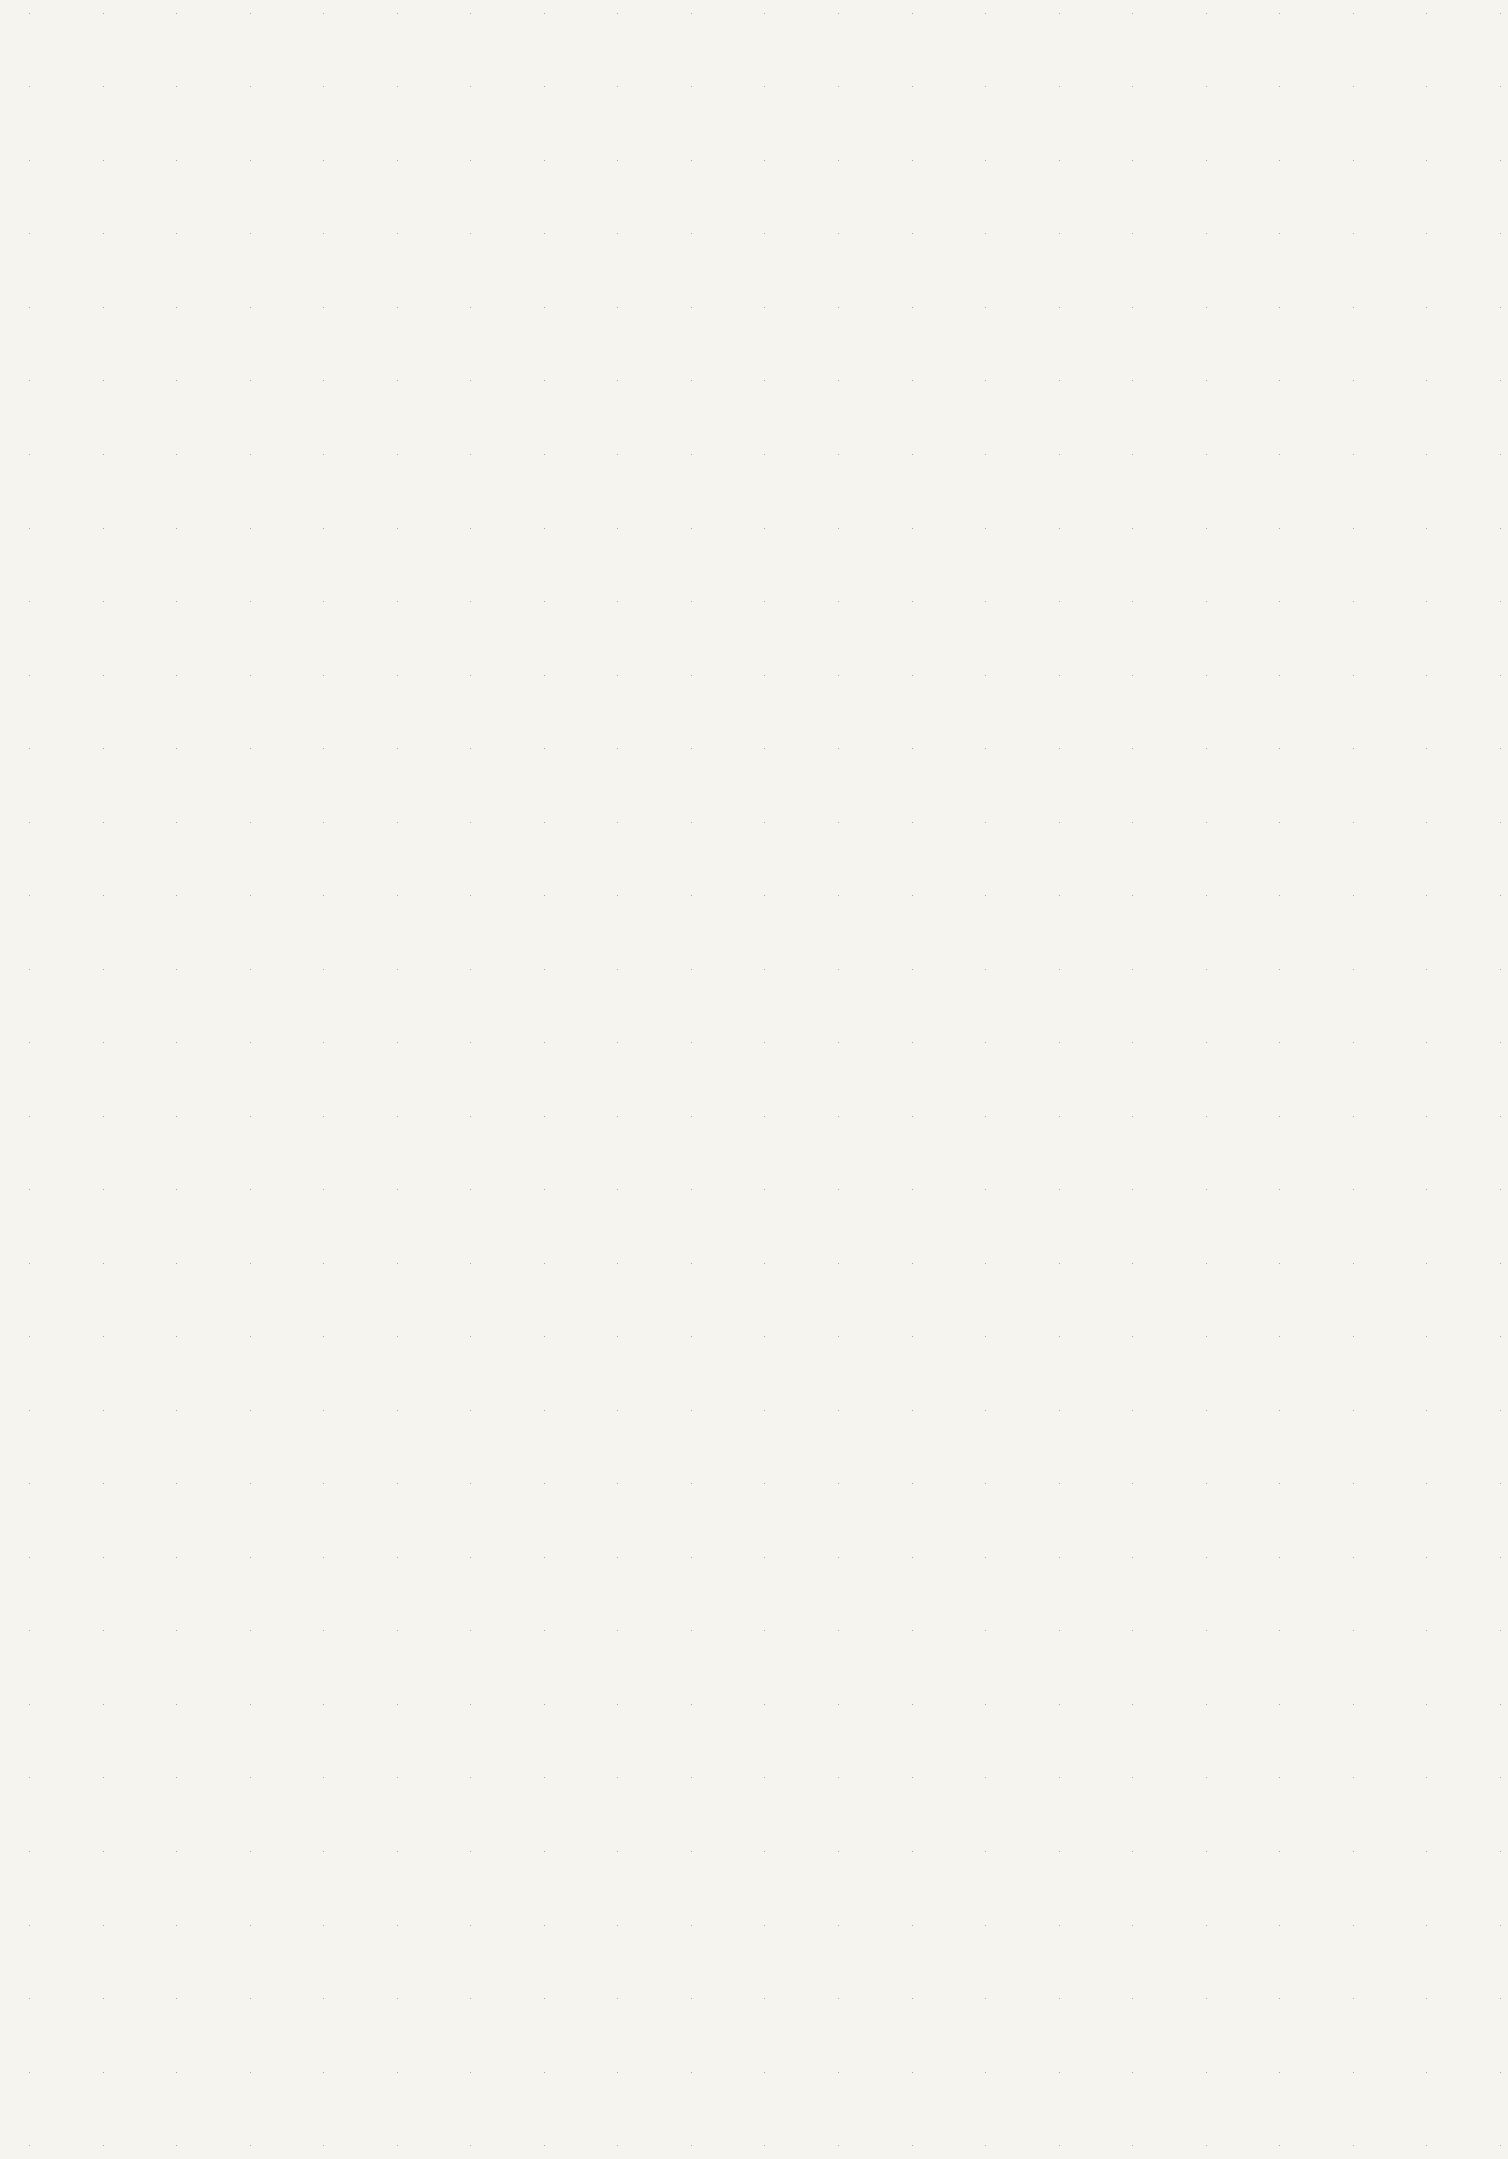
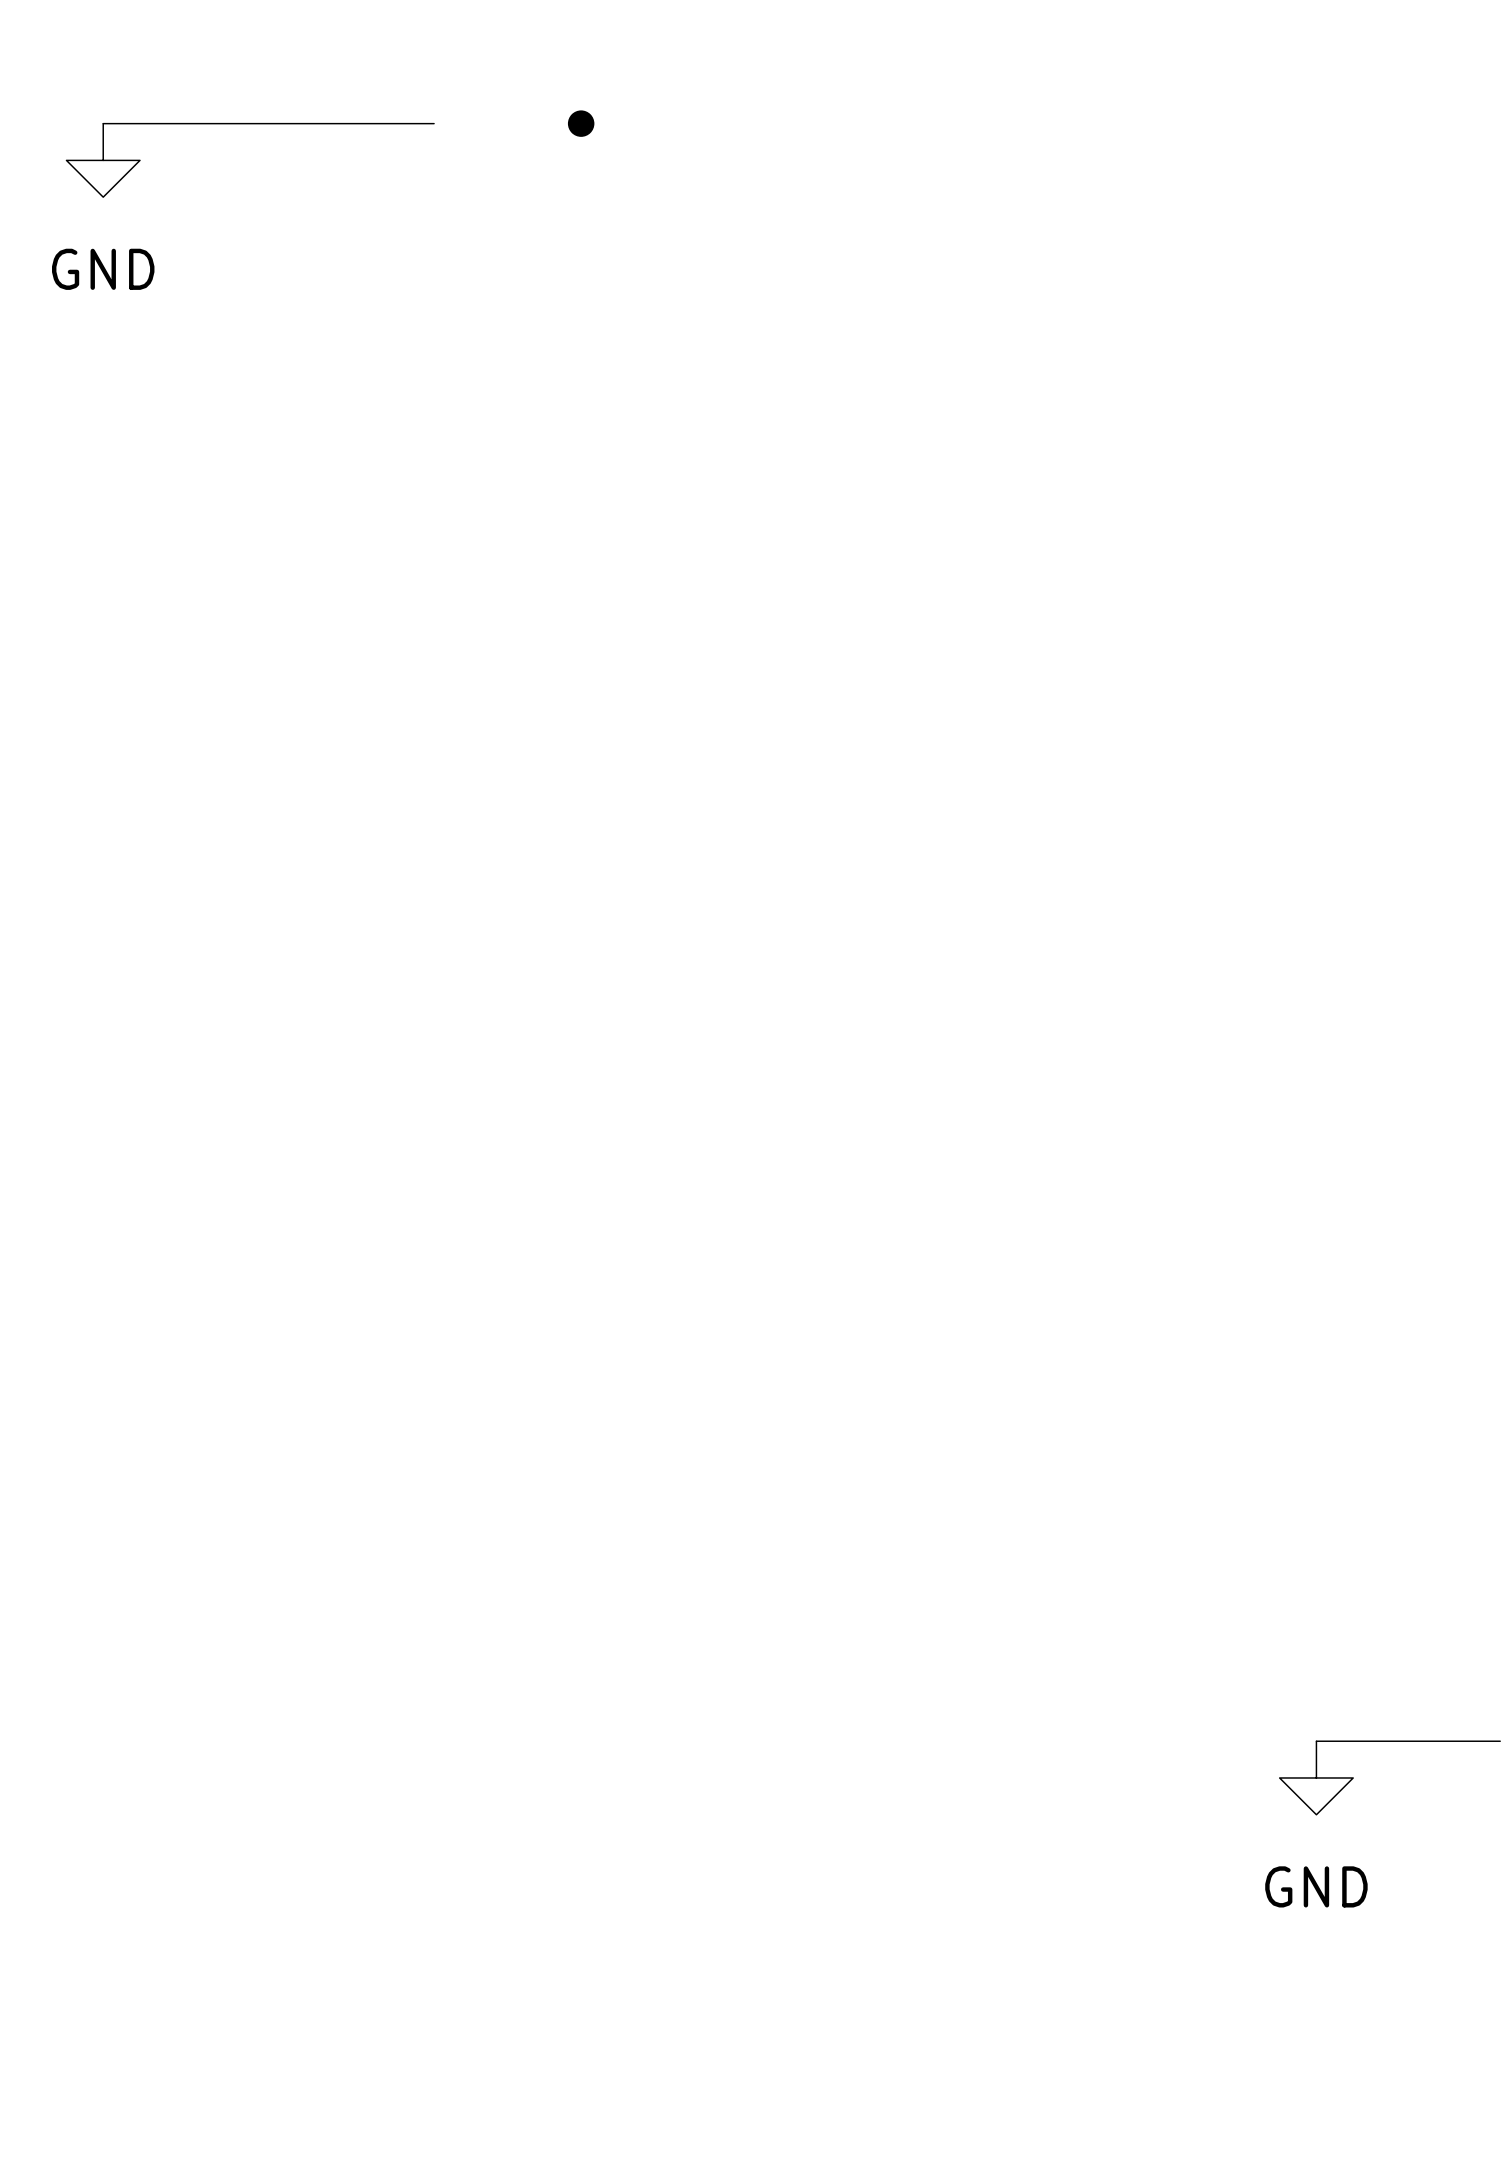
wire: none -> (103, 123) (434, 123)
junction: none -> (581, 123)
power symbol: none -> GND (103, 160)
wire: none -> (1316, 1741) (1500, 1741)
power symbol: none -> GND (1316, 1777)

